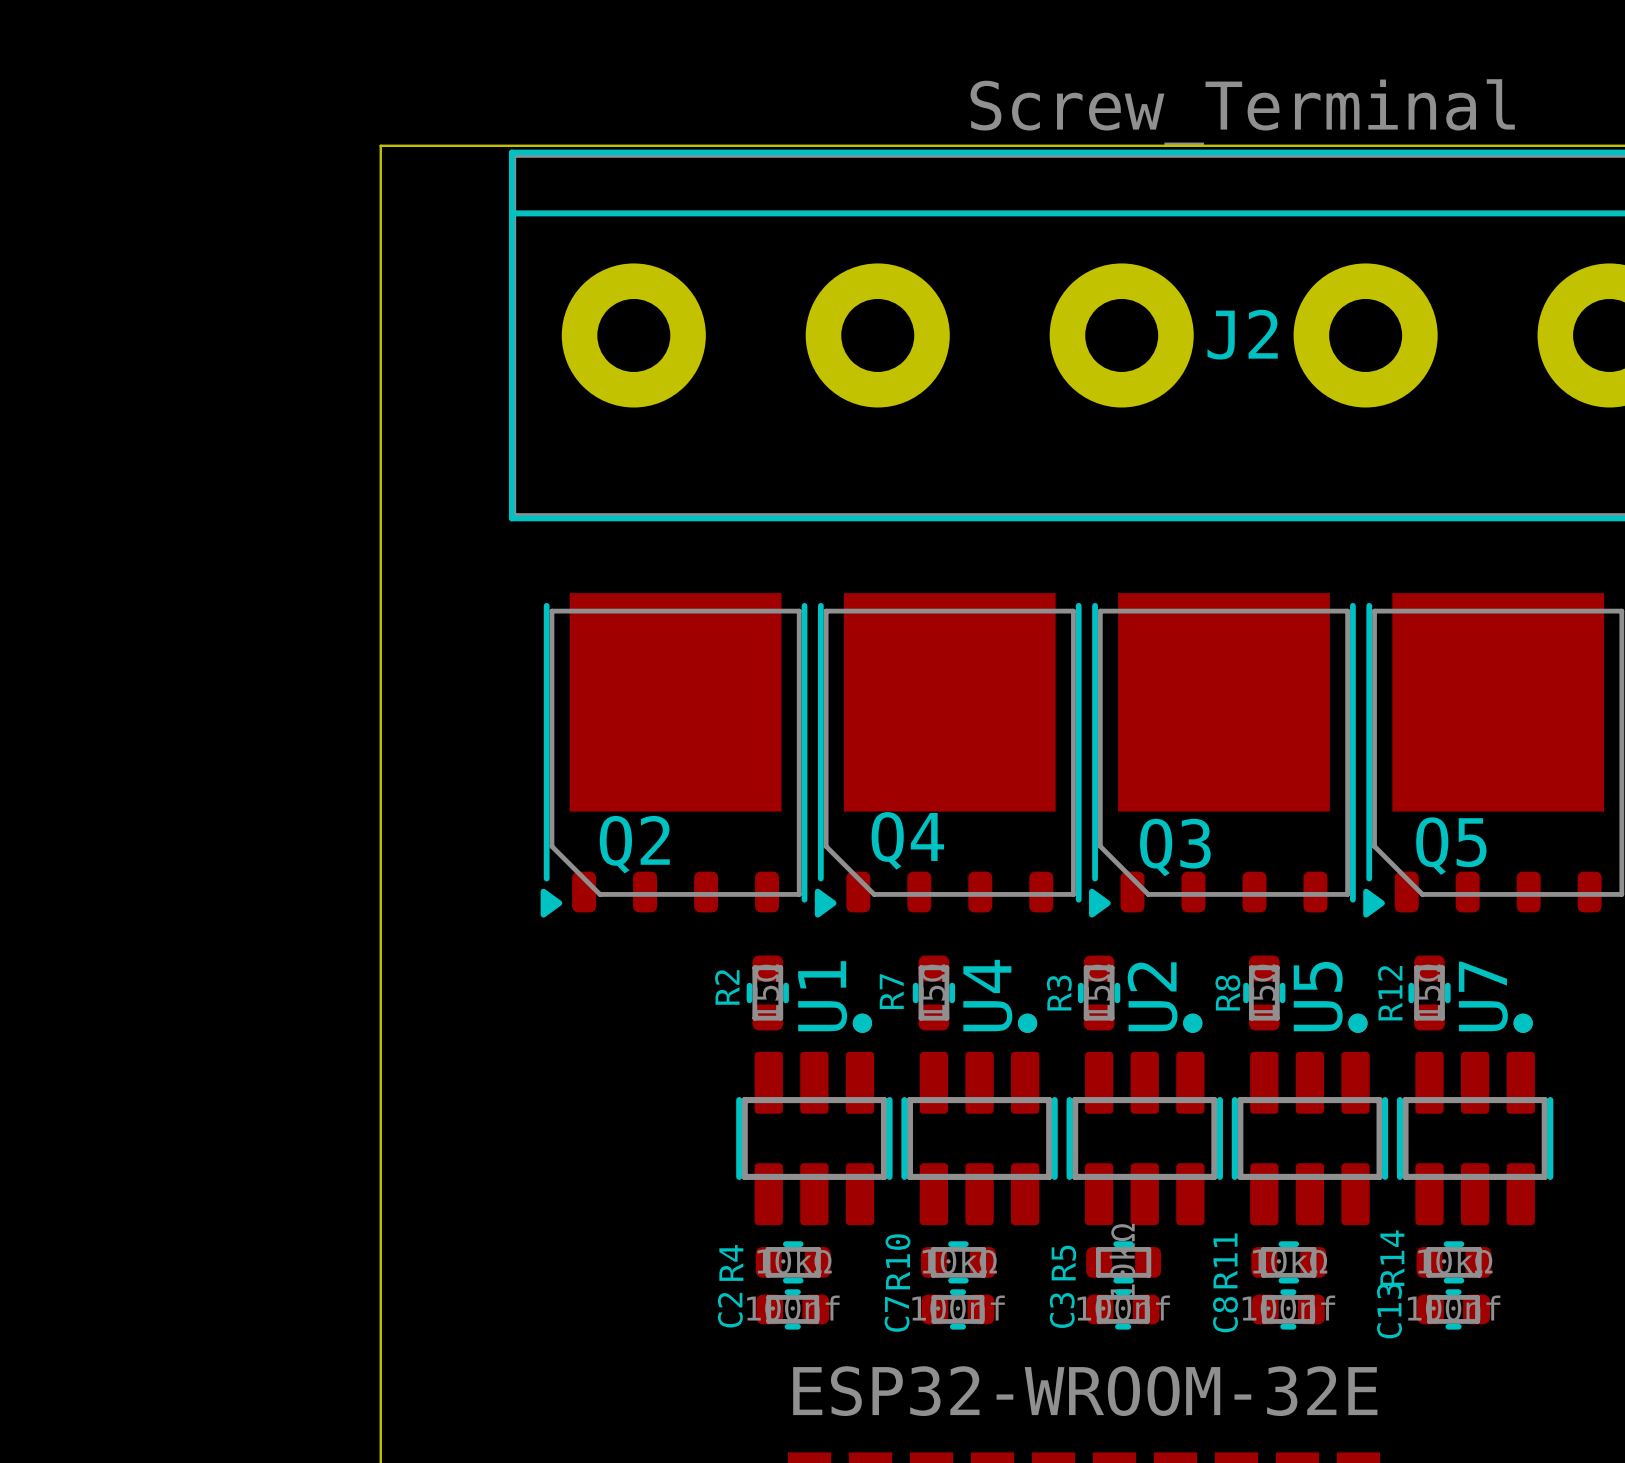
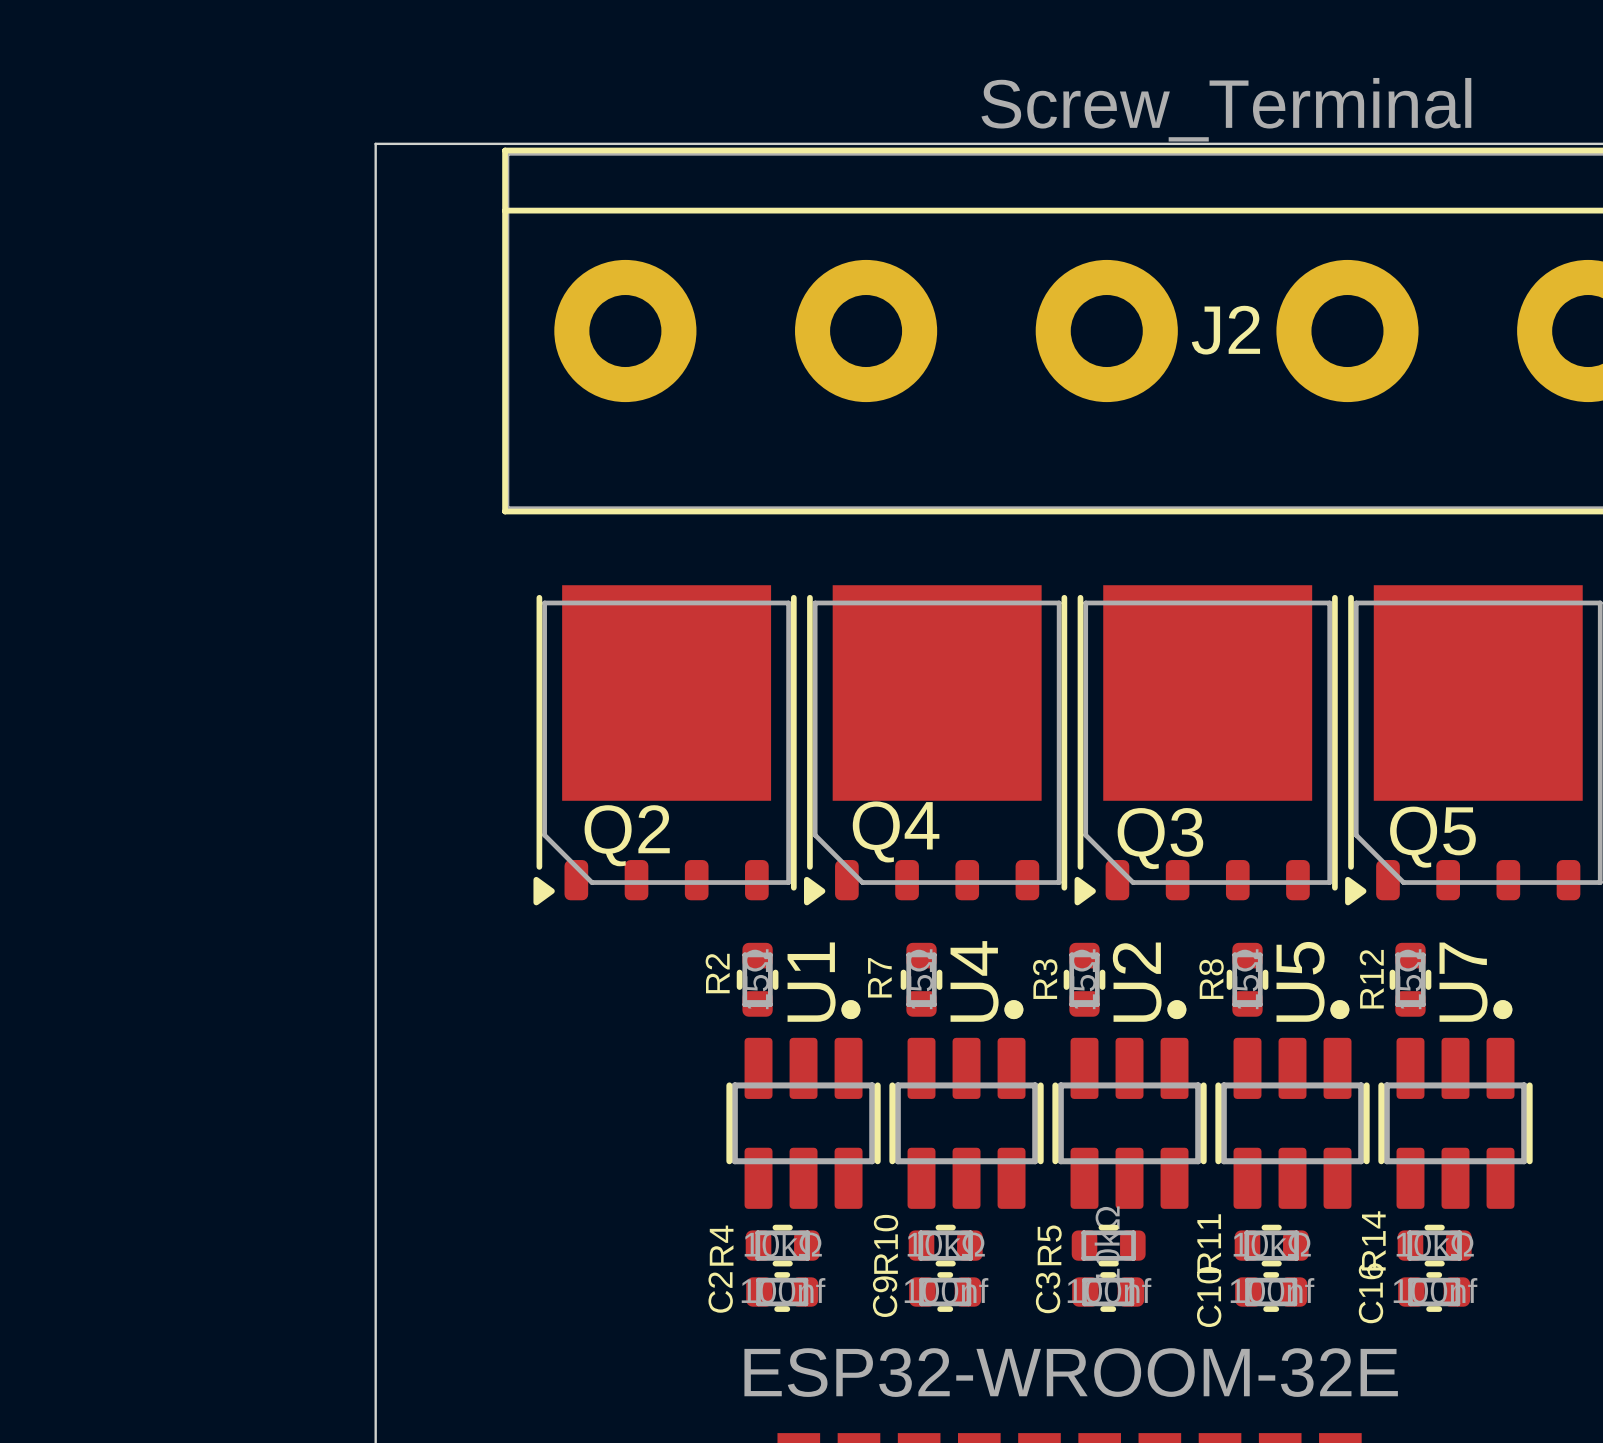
C13 name: C13 (1389, 1311) -> C16 (1370, 1293)
C7 name: C7 (897, 1314) -> C9 (885, 1296)
C8 name: C8 (1225, 1314) -> C10 (1209, 1297)

